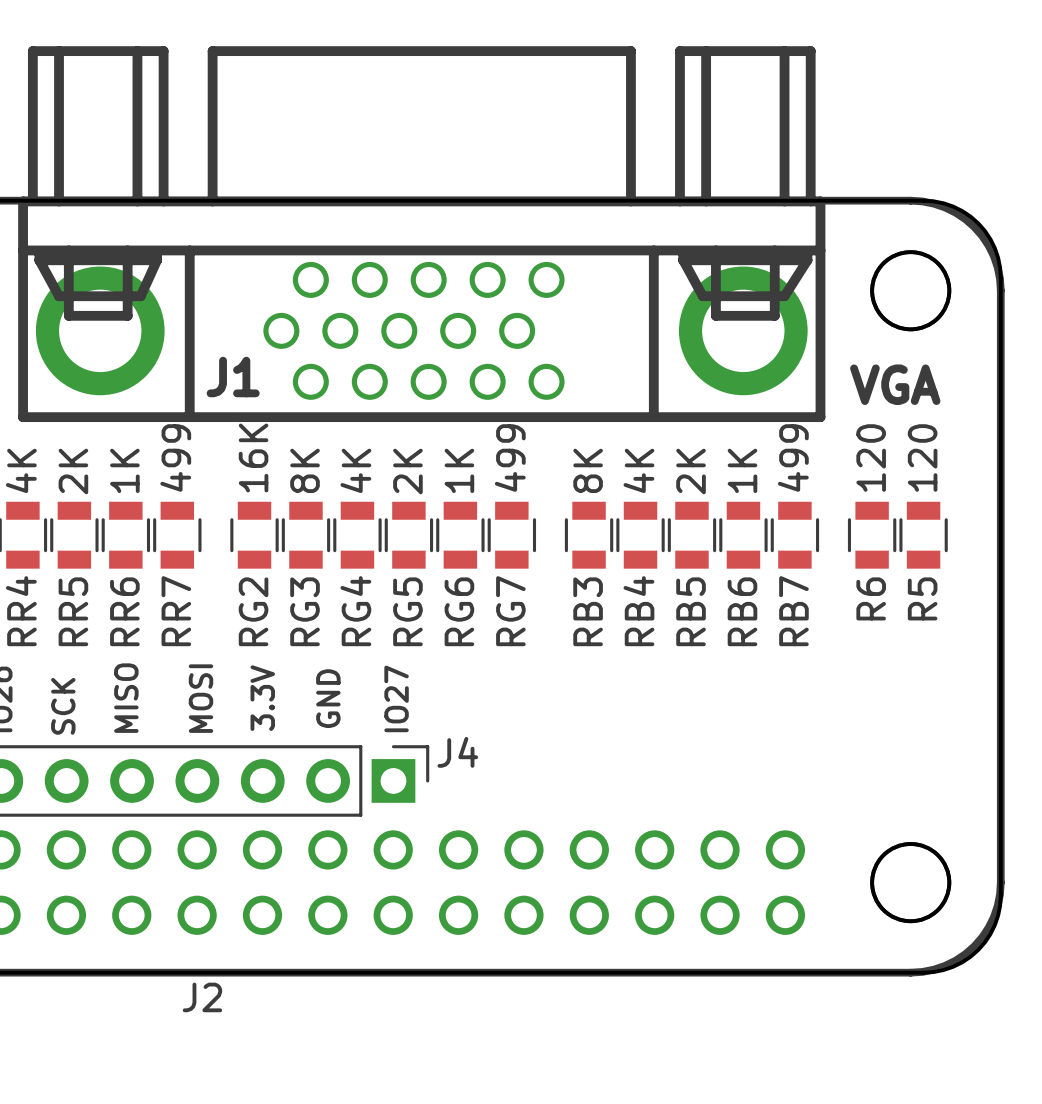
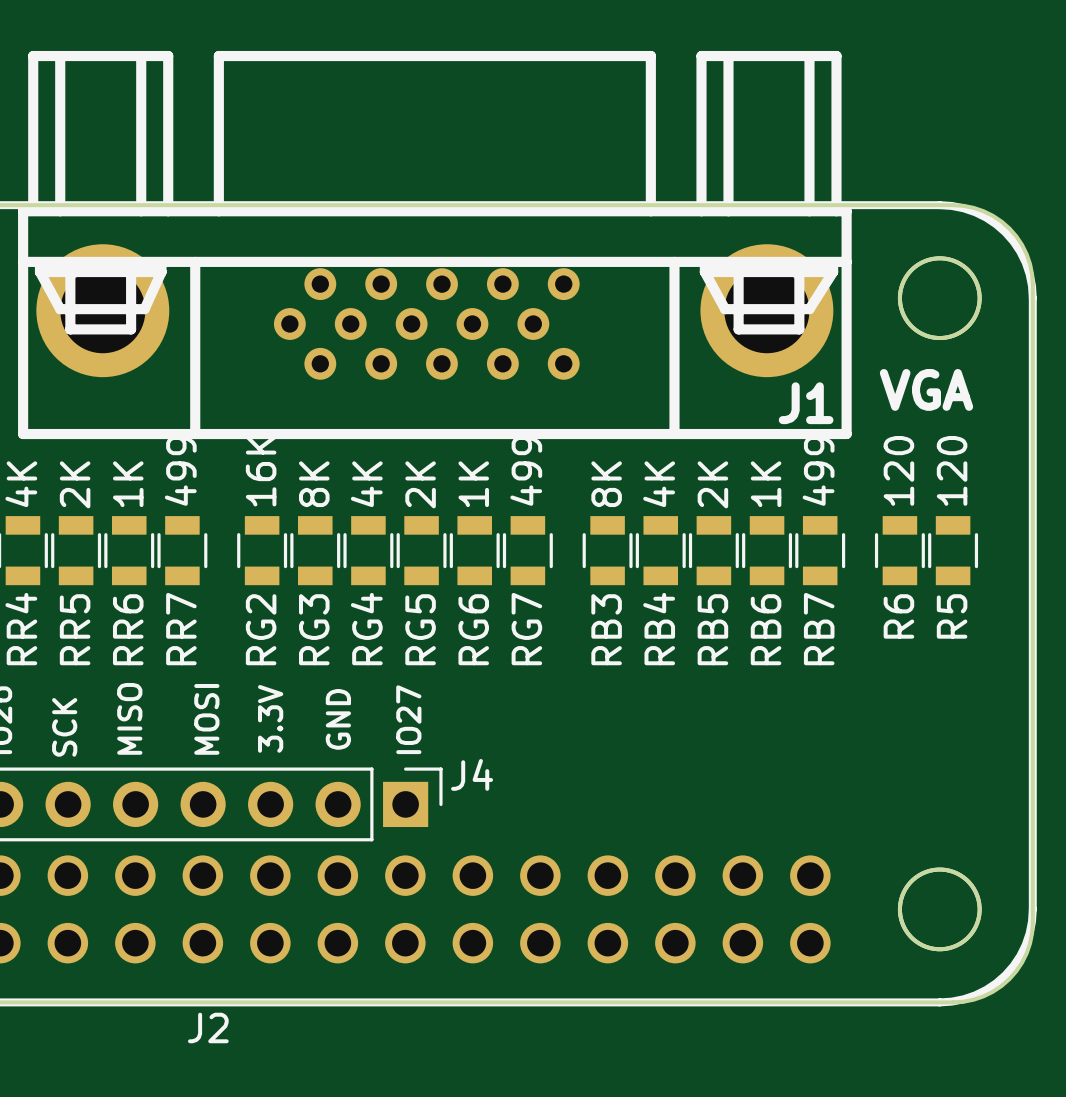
J1 footprint: [18, 46, 826, 423] -> [18, 50, 852, 440]
J1 name position: J1 (233, 377) -> J1 (806, 403)

